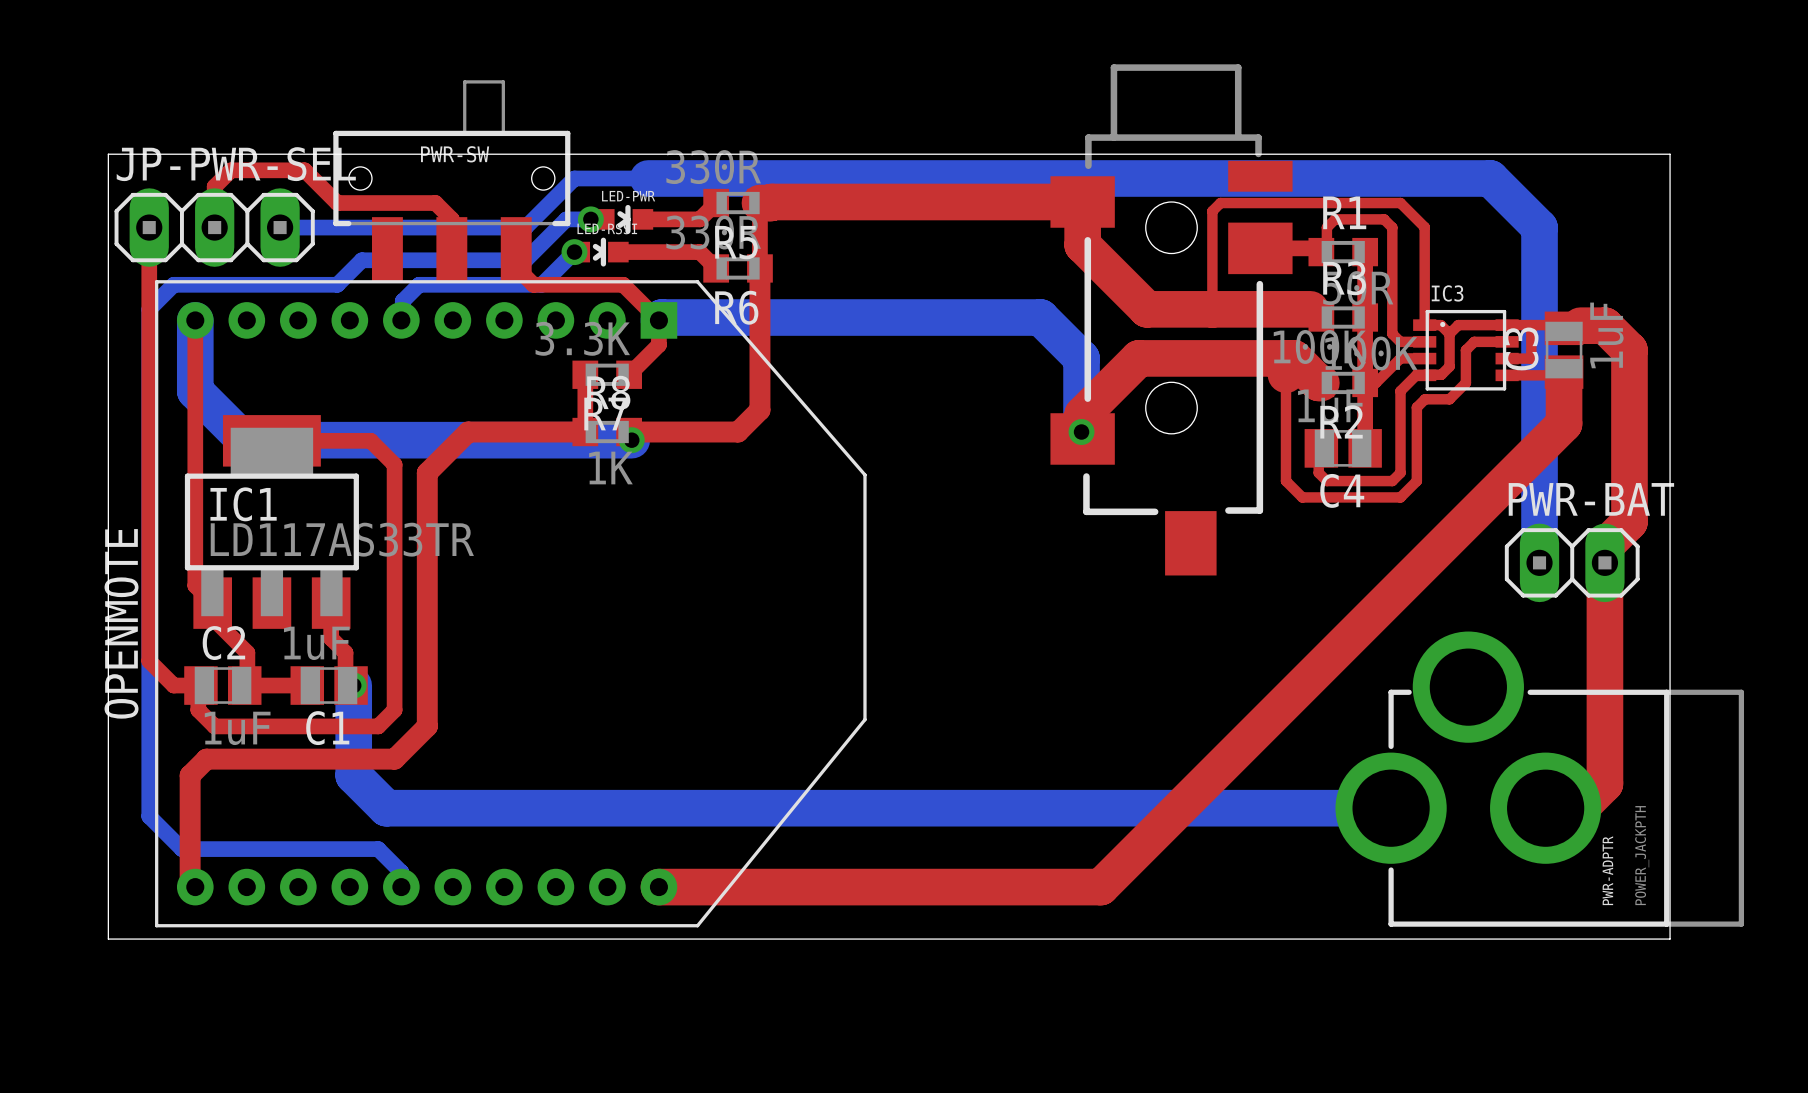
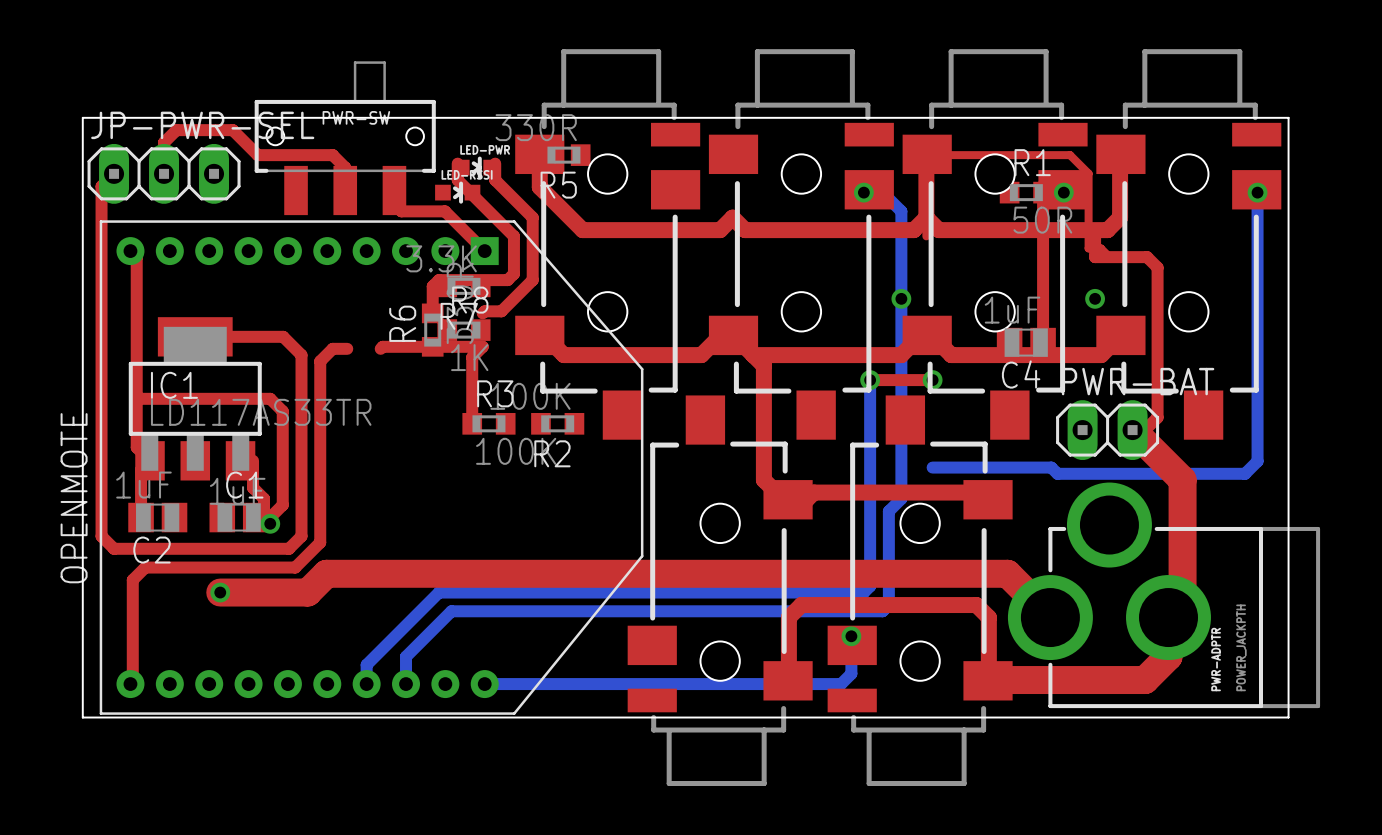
board edge: (1670, 154) (1670, 939) -> (1276, 117) (1288, 117) (1288, 717) (1276, 717)
top track: none -> (539, 154) (539, 187) (582, 230) (720, 230) (732, 217) (745, 230) (913, 230) (926, 217) (938, 230) (1107, 230) (1120, 217) (1120, 154)
top track: (716, 203) (699, 219) (642, 219) -> none
top track width: thin (1212, 211) (1212, 284) -> thick (926, 161) (926, 217)
top track: none -> (457, 163) (457, 180) (513, 236) (513, 273) (507, 280) (438, 280) (432, 286) (432, 313)
top track: none -> (495, 163) (495, 180) (532, 217) (532, 280) (501, 311) (484, 311) (482, 313)
bottom track: (590, 219) (566, 219) (525, 260) (361, 260) (337, 284) (173, 284) (149, 309) (149, 816) (181, 849) (378, 849) (401, 872) (401, 887) -> none
via: (590, 219) -> none
top track: (149, 227) (149, 661) (173, 685) (200, 685) (198, 688) (198, 710) (214, 726) (378, 726) (394, 710) (394, 701) -> (114, 173) (101, 186) (101, 536) (114, 548) (289, 548) (301, 536)
bottom track: (280, 227) (525, 227) (574, 178) (1490, 178) (1539, 227) (1539, 562) -> none
top track: (1260, 248) (1317, 248) (1321, 252) (1326, 246) (1326, 227) (1335, 219) (1384, 219) (1392, 227) (1392, 333) (1400, 341) (1424, 341) -> none
bottom track: (574, 252) (541, 284) (419, 284) (402, 301) (401, 320) -> none
via: (574, 252) -> none
top track: (618, 252) (699, 252) (716, 268) -> none
bottom track: none -> (863, 192) (882, 192) (901, 211) (901, 498) (888, 511) (888, 605) (882, 611) (451, 611) (406, 656) (406, 684)
via: none -> (863, 192)
via: none -> (1063, 192)
bottom track: none -> (1257, 192) (1257, 461) (1245, 473) (1057, 473) (1051, 467) (932, 467)
via: none -> (1257, 192)
R6 rotation: 0° (738, 268) -> 90° clockwise (432, 330)
R6 position: (738, 268) -> (432, 330)
top track: (525, 276) (533, 284) (623, 284) (658, 320) (658, 344) (629, 374) -> (401, 211) (445, 211) (484, 251)
top track: none -> (1095, 230) (1095, 257) (1147, 257) (1157, 267) (1157, 417) (1145, 430) (1132, 430) (1182, 480) (1182, 605) (1168, 617) (1168, 656) (1145, 680) (988, 680) (988, 617) (976, 605) (801, 605) (788, 617) (788, 680)
top track: (1321, 317) (1318, 317) (1310, 309) (1146, 309) (1082, 245) (1082, 201) (759, 203) (759, 410) (738, 432) (629, 432) (629, 437) (631, 440) -> none
R3 position: (1343, 317) -> (488, 423)
part: none -> (607, 244)
part: none -> (801, 244)
part: (1171, 319) -> none
part: none -> (995, 244)
part: none -> (1188, 244)
top track: (195, 320) (195, 585) (212, 603) (212, 618) (247, 652) (247, 682) (244, 685) (307, 685) -> none
bottom track: (195, 320) (195, 391) (244, 440) (631, 440) -> none
bottom track: (658, 320) (661, 317) (1040, 317) (1081, 358) (1081, 432) -> none
top track: (1531, 325) (1531, 358) (1507, 358) -> none
top track: none -> (130, 251) (136, 257) (136, 447) (150, 460) (141, 469) (141, 517)
top track: (1507, 341) (1474, 341) (1465, 350) (1465, 382) (1449, 399) (1425, 399) (1416, 407) (1416, 481) (1400, 497) (1302, 497) (1286, 481) (1286, 358) -> none
IC3: (1465, 350) -> none
C3: 1uF (1564, 350) -> none
top track: (1424, 358) (1400, 358) (1375, 382) (1365, 382) -> none
top track: (585, 374) (585, 432) (468, 432) (427, 472) (427, 726) (394, 759) (206, 759) (190, 775) (190, 881) (195, 887) -> none
top track: (1507, 375) (1560, 375) -> none
top track: (1560, 375) (1560, 379) (1564, 382) (1564, 423) (1100, 887) (658, 887) -> none
top track: (1321, 382) (1318, 382) (1294, 358) (1138, 358) (1082, 414) (1082, 438) -> none
R2 position: (1343, 382) -> (557, 423)
via: none -> (901, 298)
via: none -> (1095, 298)
via: (1081, 432) -> none
top track: none -> (539, 335) (544, 335) (563, 355) (701, 355) (720, 336)
top track: none -> (733, 335) (763, 365) (763, 480) (783, 499) (806, 499) (813, 492) (980, 492) (988, 499)
top track: none -> (1120, 335) (1101, 355) (951, 355) (931, 335) (921, 335) (901, 355) (753, 355)
via: (631, 440) -> none
top track: (1321, 448) (1318, 451) (1318, 472) (1326, 481) (1392, 481) (1400, 472) (1400, 391) (1416, 375) (1441, 374) (1449, 366) (1449, 333) (1458, 325) (1560, 325) (1564, 328) (1566, 325) (1604, 325) (1629, 350) (1629, 521) (1604, 546) (1604, 783) (1580, 808) (1545, 808) -> none
top track: none -> (347, 348) (332, 348) (320, 361) (320, 542) (295, 567) (145, 567) (132, 580) (132, 681) (130, 684)
top track: none -> (380, 348) (382, 346) (482, 346) (472, 357) (472, 423)
top track: none -> (870, 380) (932, 380)
bottom track: none -> (870, 380) (870, 586) (863, 592) (438, 592) (366, 664) (366, 684)
via: none -> (870, 380)
via: none -> (932, 380)
top track: none -> (136, 398) (270, 398) (282, 411) (282, 505) (270, 517) (255, 517)
IC1 position: (271, 521) -> (195, 398)
PWR-BAT position: (1572, 562) -> (1107, 430)
OPENMOTE position: (510, 603) -> (371, 467)
C2 name position: C2 (223, 643) -> C2 (152, 550)
C2 position: (222, 685) -> (157, 517)
C1 position: (329, 685) -> (239, 517)
bottom track: (353, 685) (353, 775) (386, 808) (1391, 808) -> none
C2 value position: 1uF (237, 728) -> 1uF (143, 485)
C1 name position: C1 (327, 728) -> C1 (244, 485)
part: none -> (720, 590)
part: none -> (920, 590)
top track: none -> (220, 592) (307, 592) (326, 573) (1007, 573) (1050, 617)
via: none -> (220, 592)
PWR-ADPTR position: (1539, 779) -> (1164, 595)
bottom track: none -> (851, 636) (851, 673) (841, 684) (484, 684)
via: none -> (851, 636)

